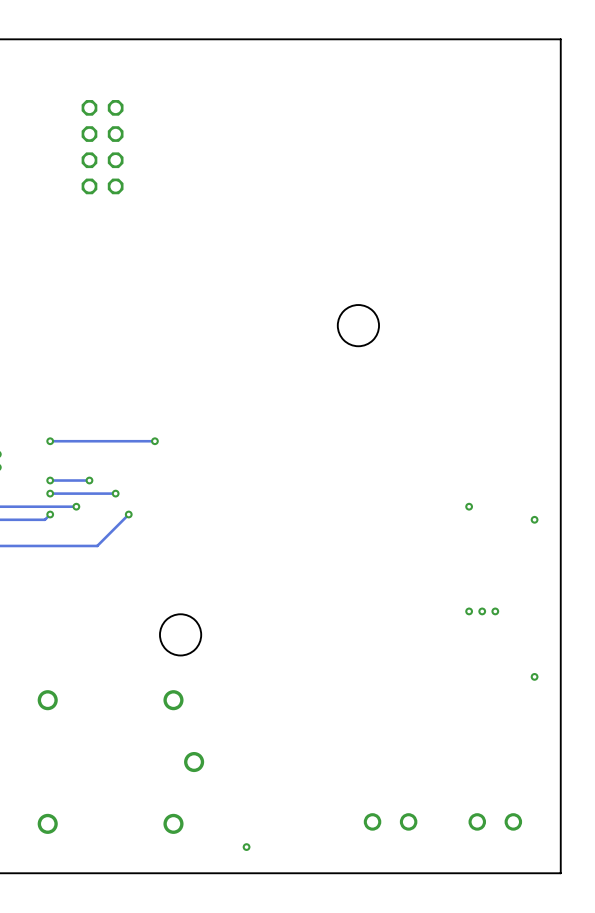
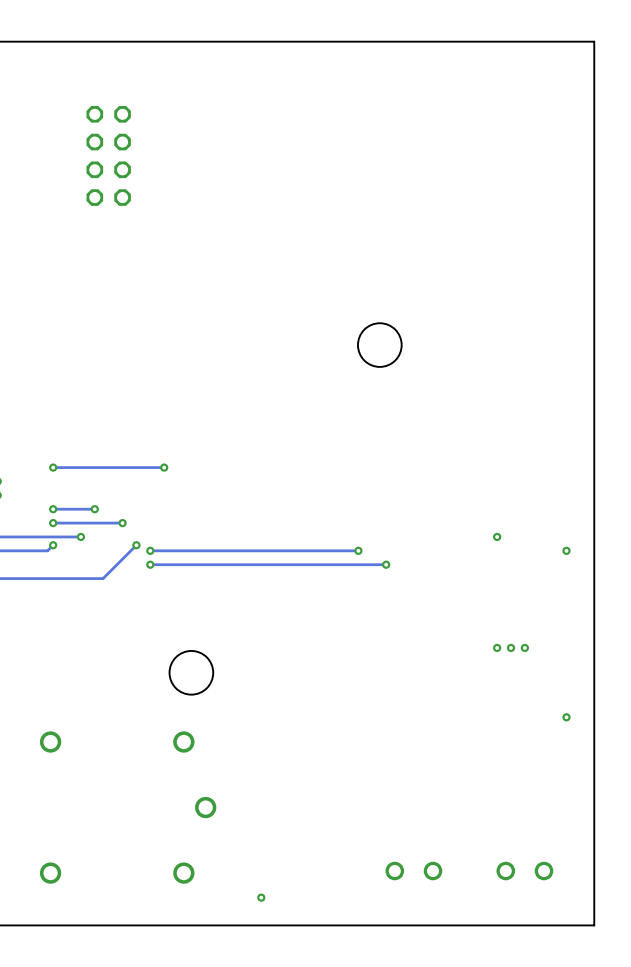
via: none -> (150, 550)
track: none -> (358, 550) (150, 550)
via: none -> (358, 550)
via: none -> (150, 564)
track: none -> (386, 564) (150, 564)
via: none -> (386, 564)

